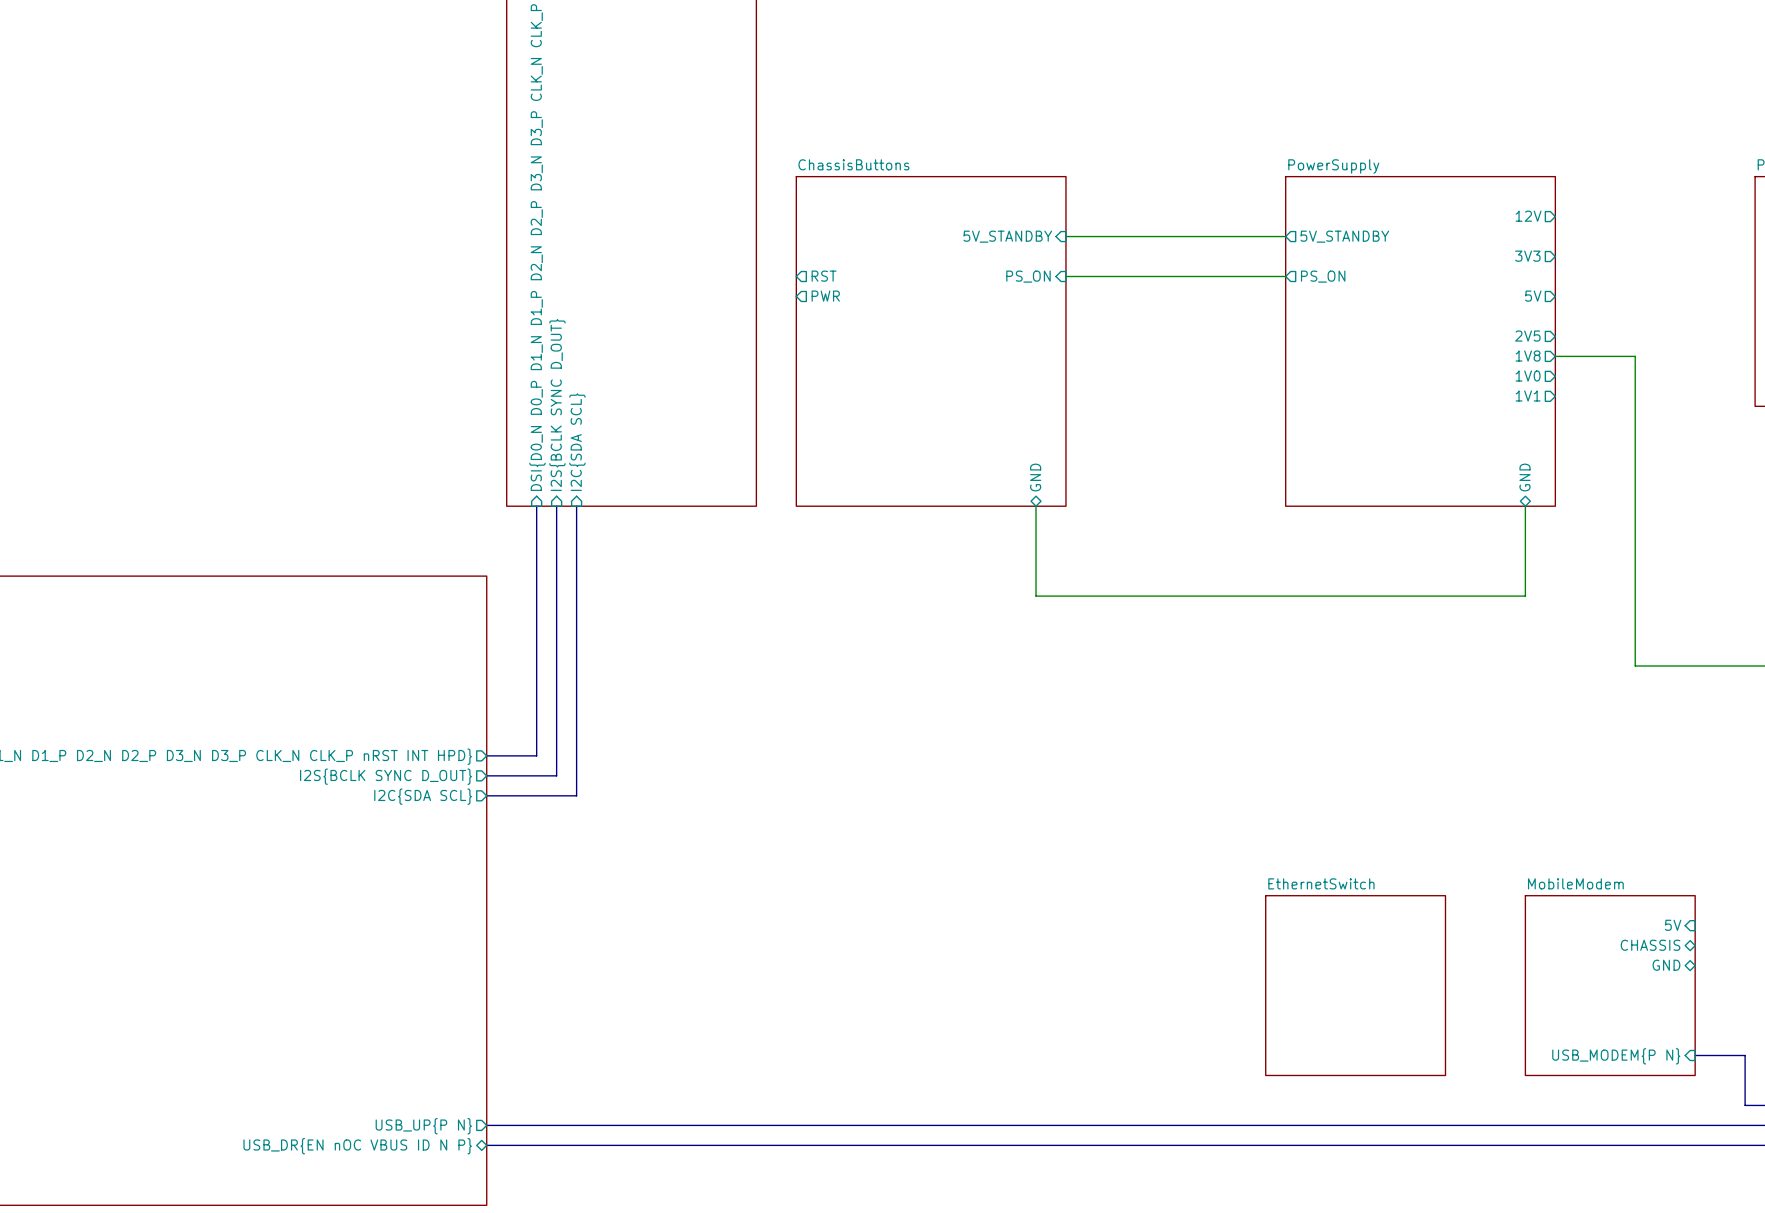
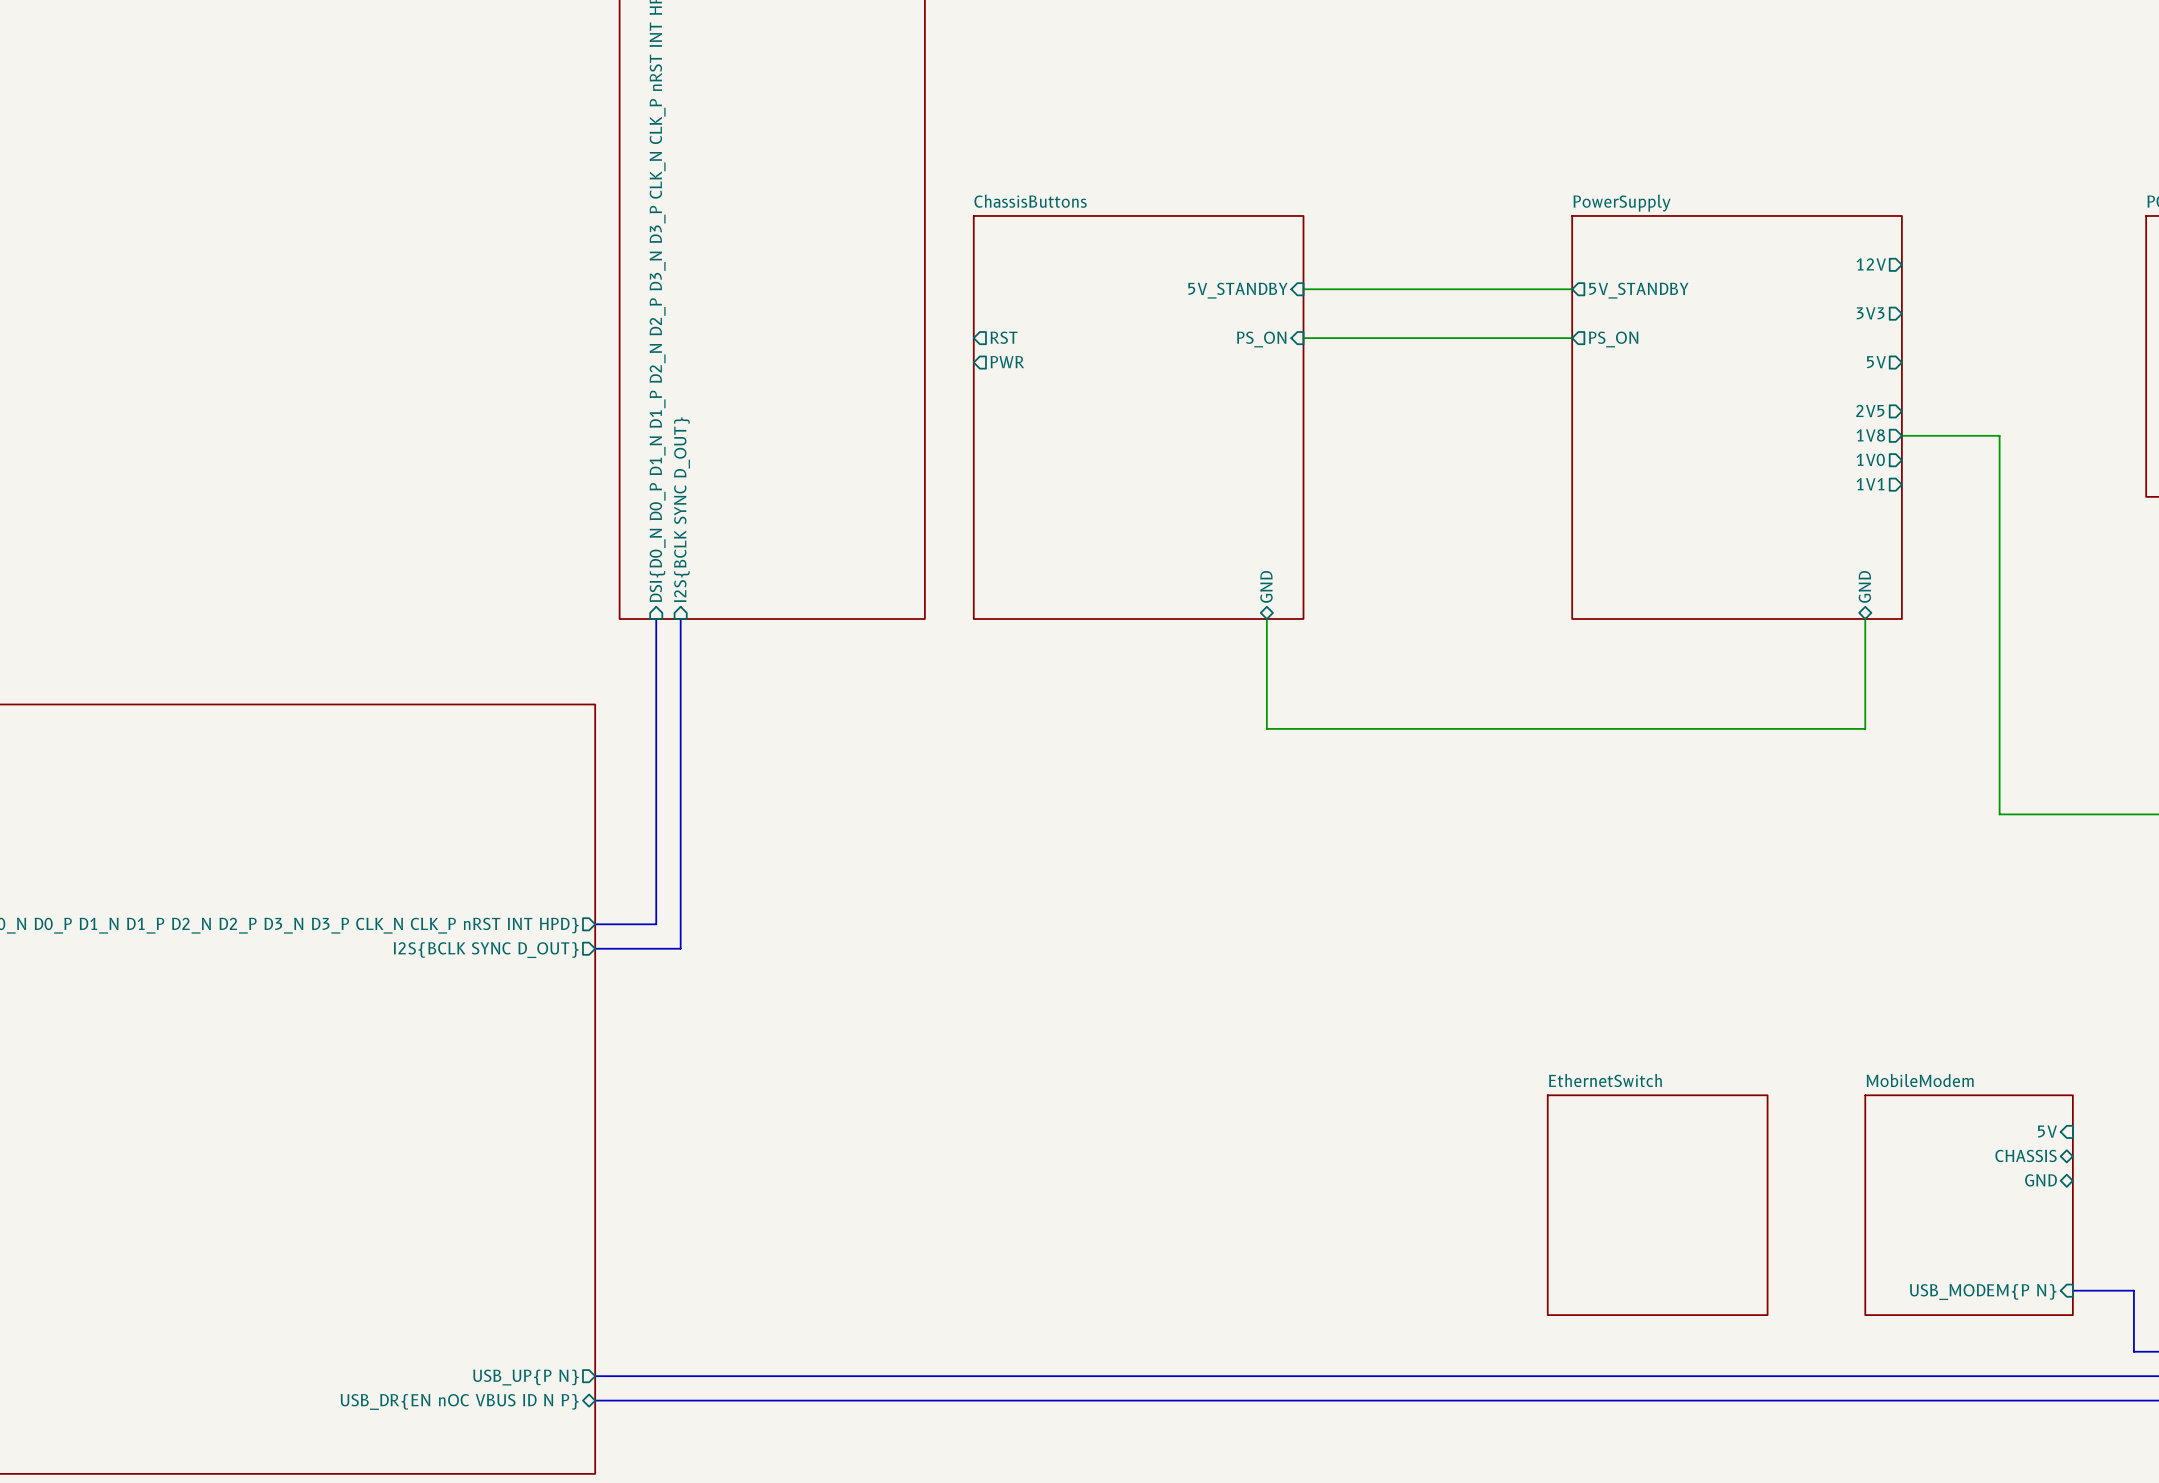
sheet pin: I2C{SDA SCL} (577, 442) -> none
bus: (576, 506) (576, 795) (486, 795) -> none
sheet pin: I2C{SDA SCL} (423, 796) -> none

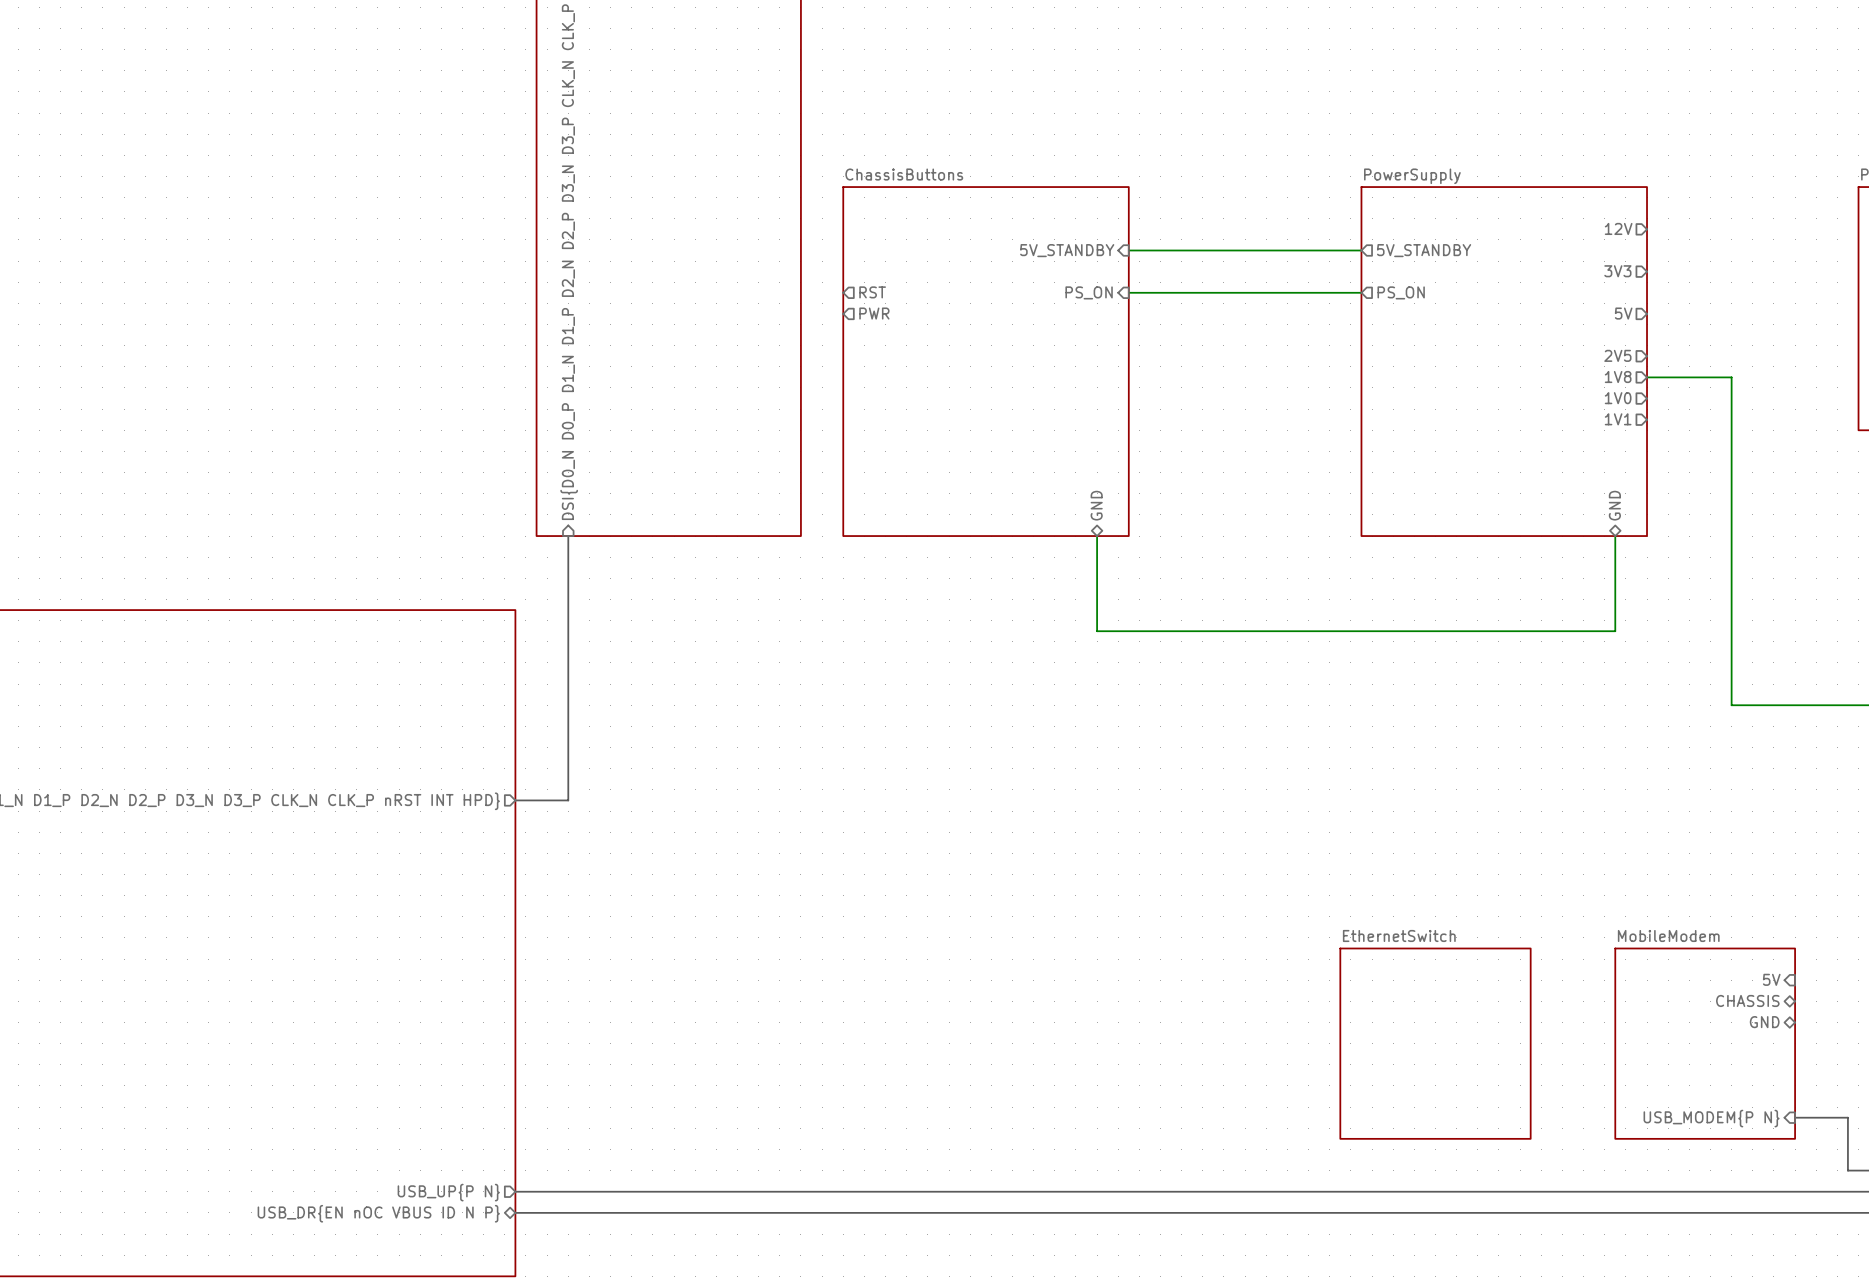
sheet pin: I2S{BCLK SYNC D_OUT} (682, 509) -> none
bus: (680, 619) (680, 948) (595, 948) -> none
sheet pin: I2S{BCLK SYNC D_OUT} (486, 950) -> none

